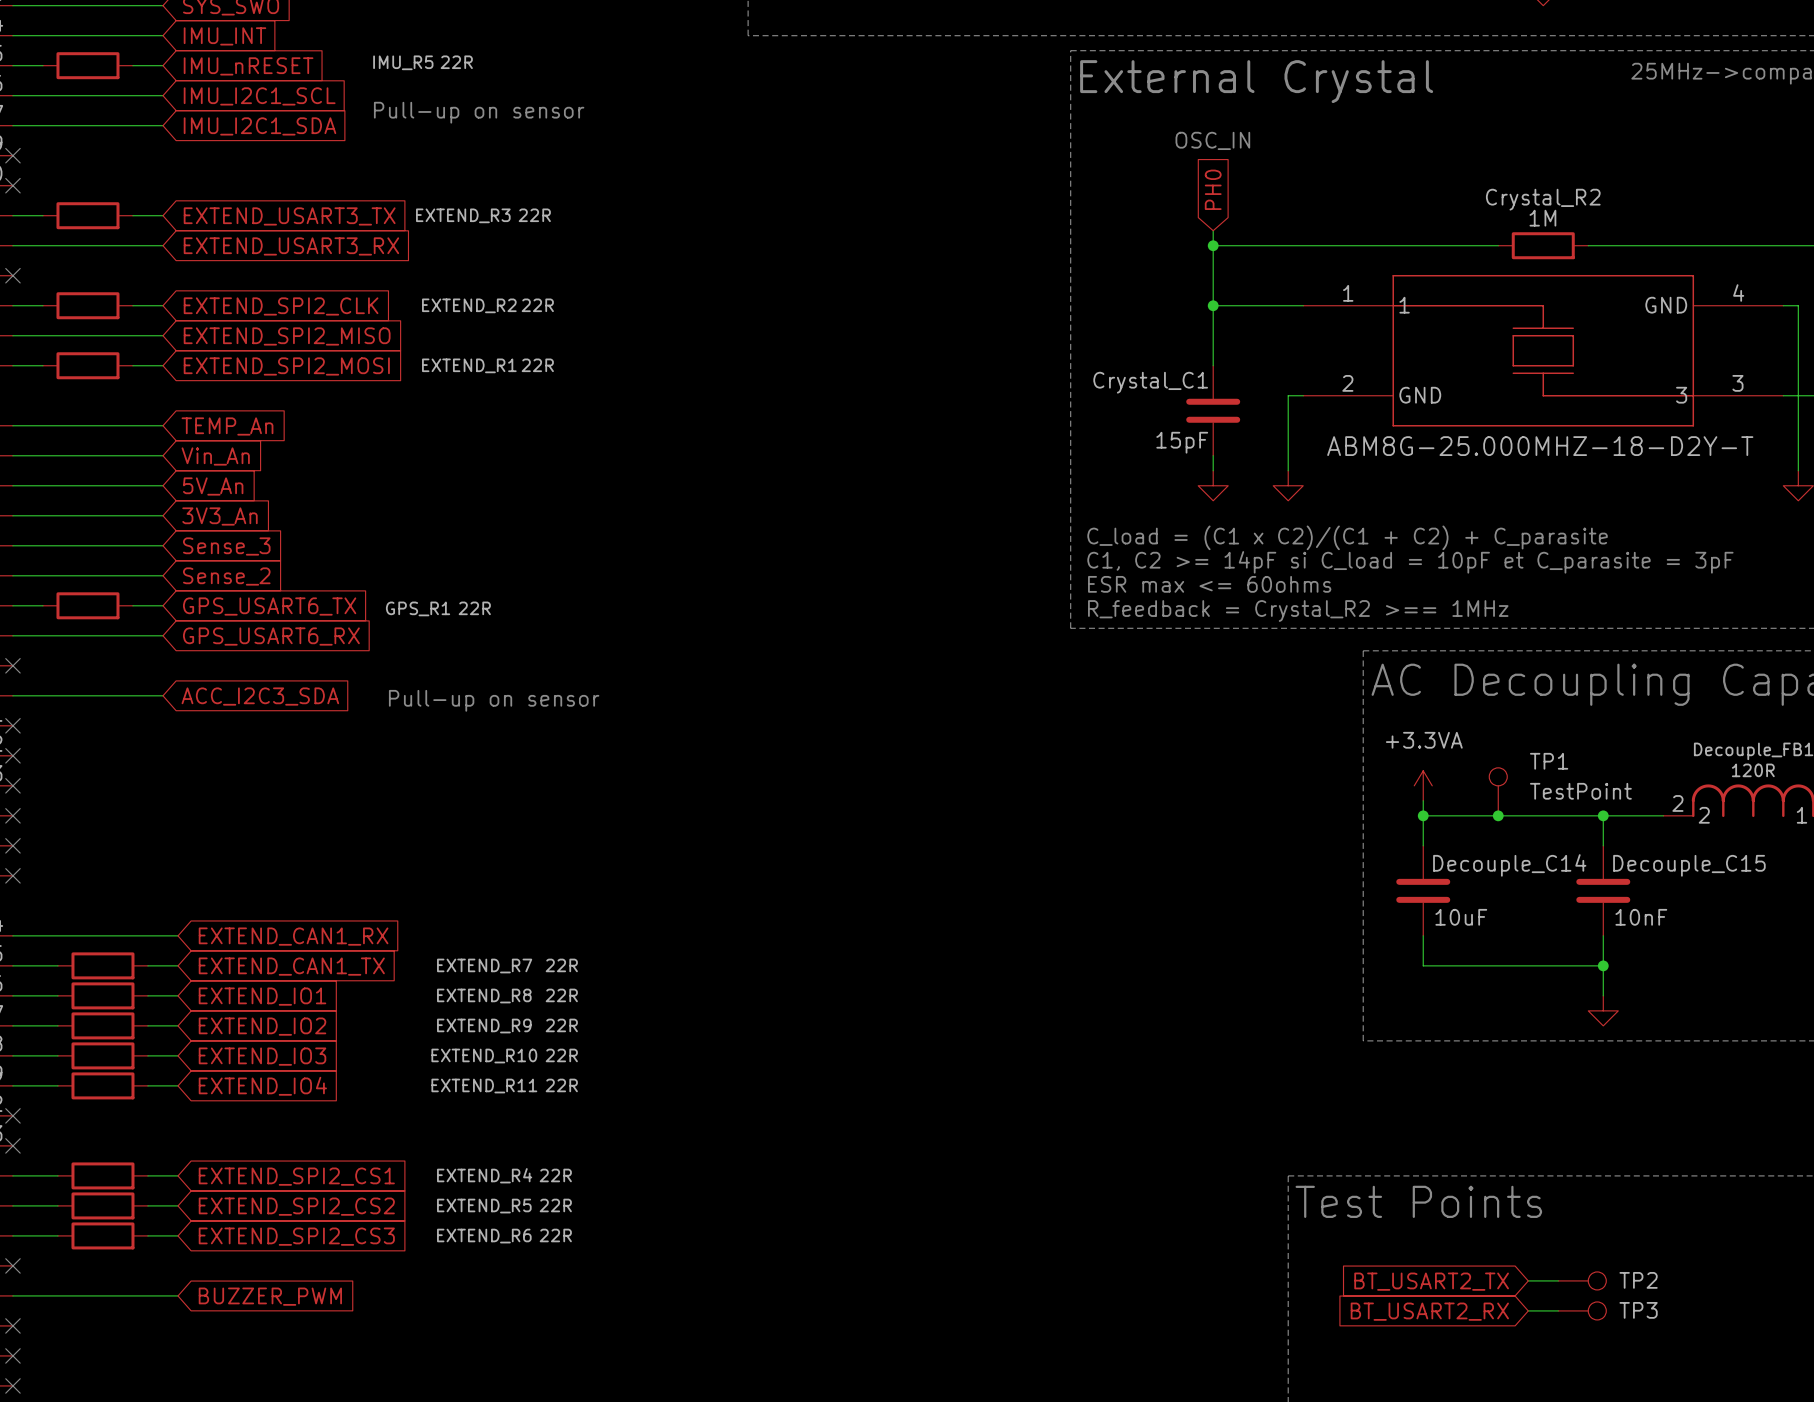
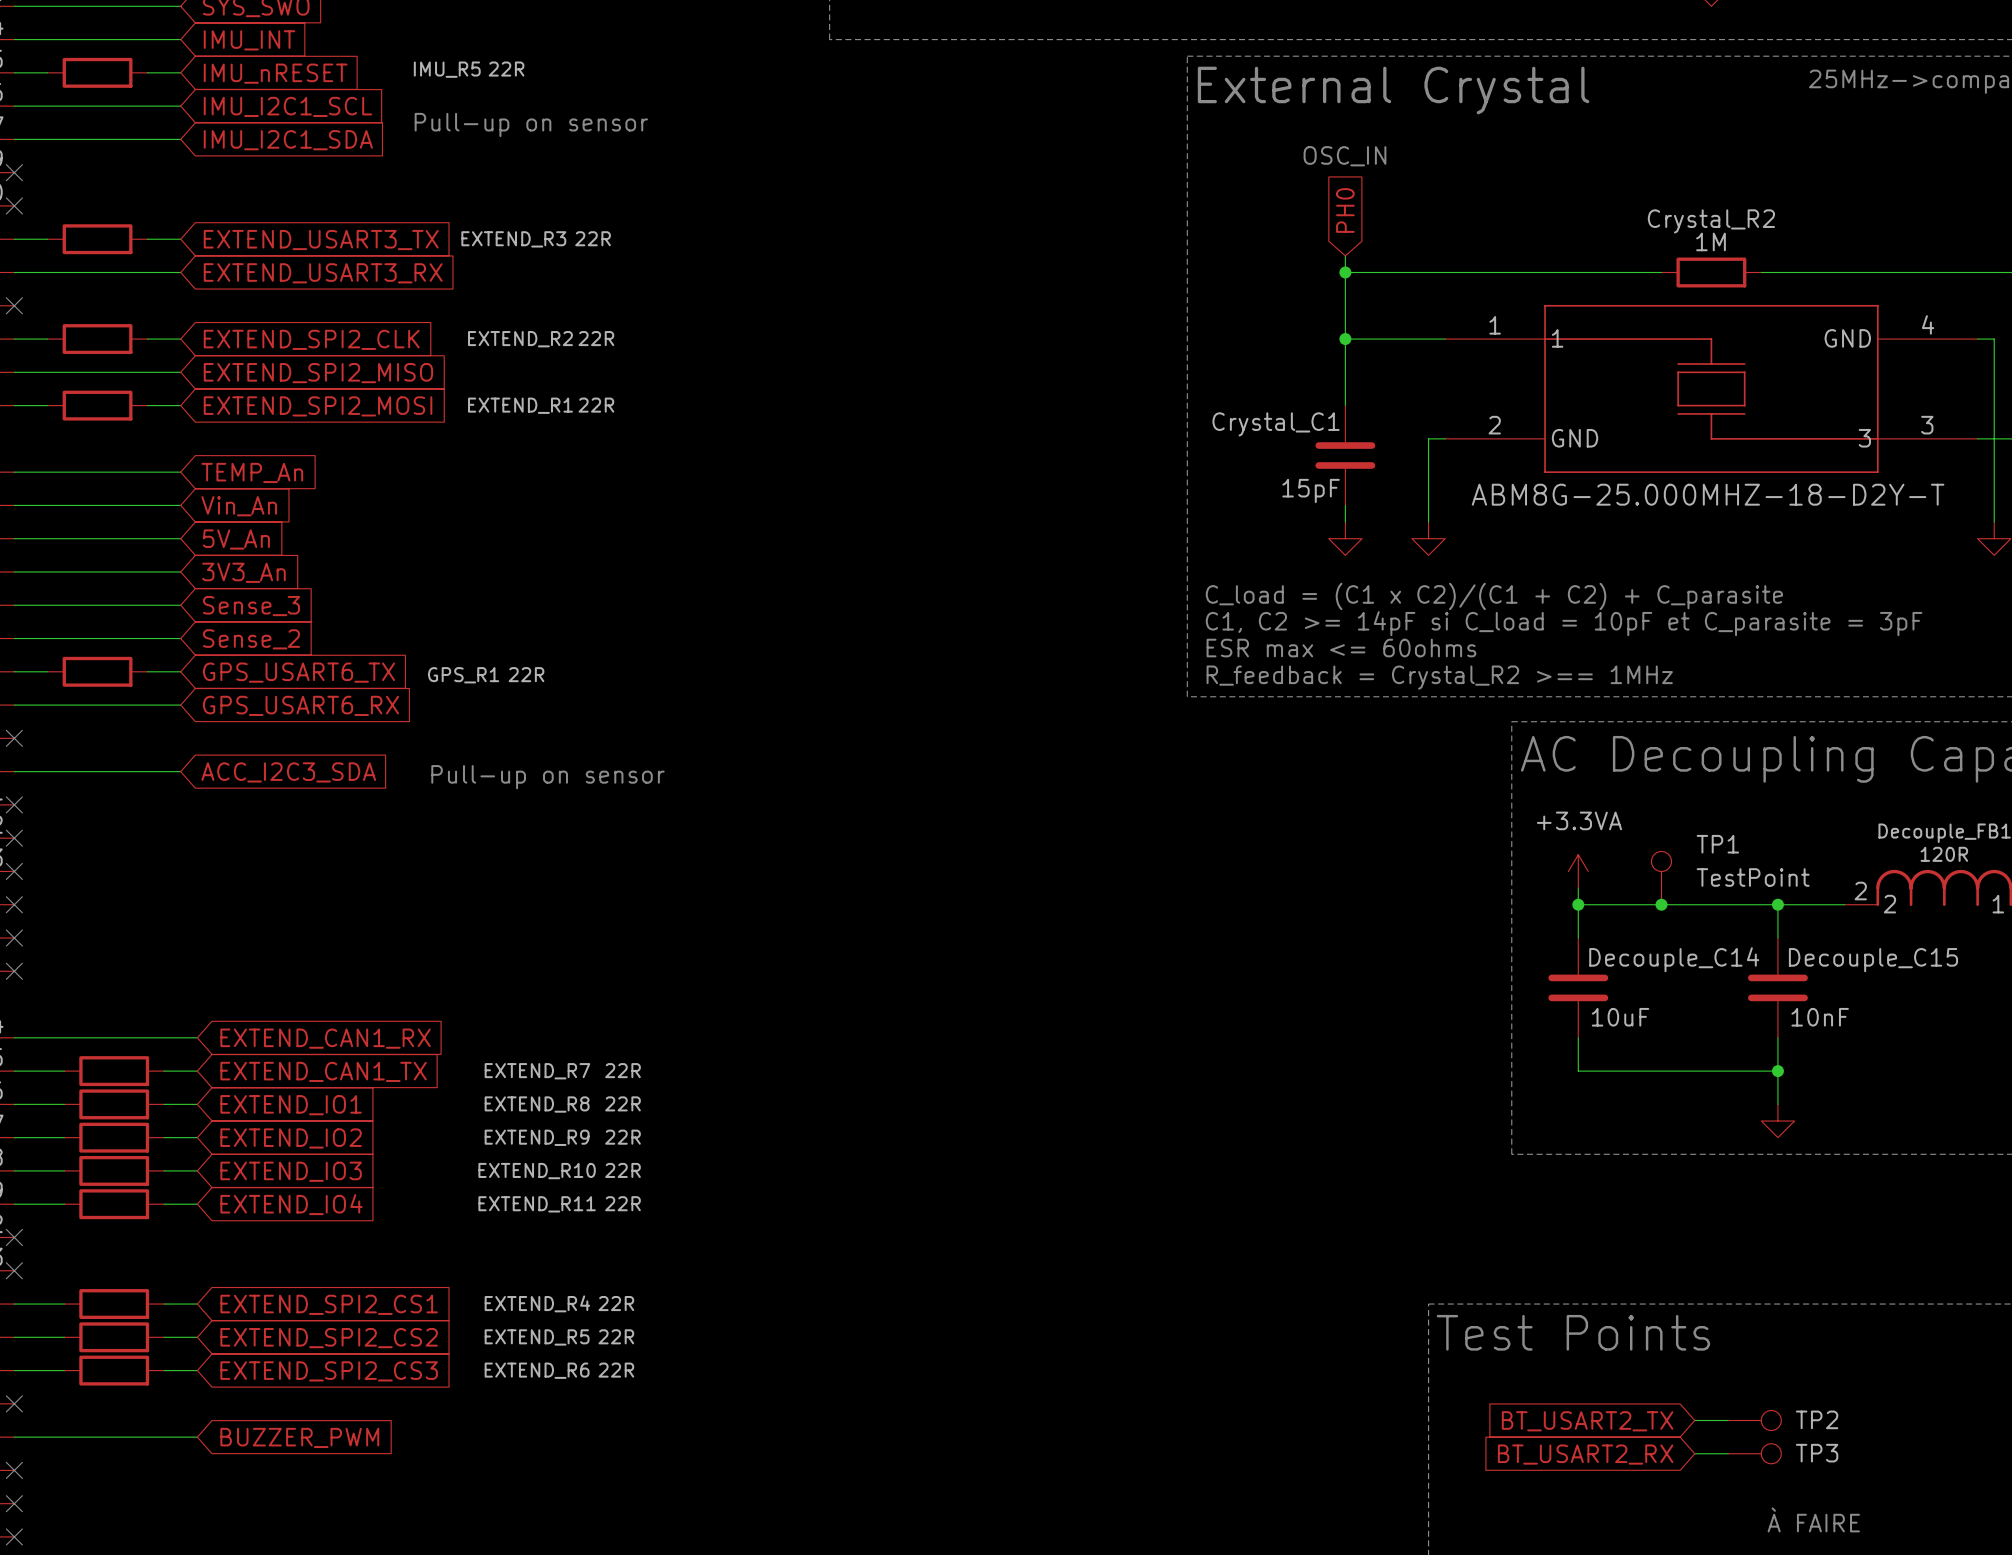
text: none -> À FAIRE (1813, 1519)

